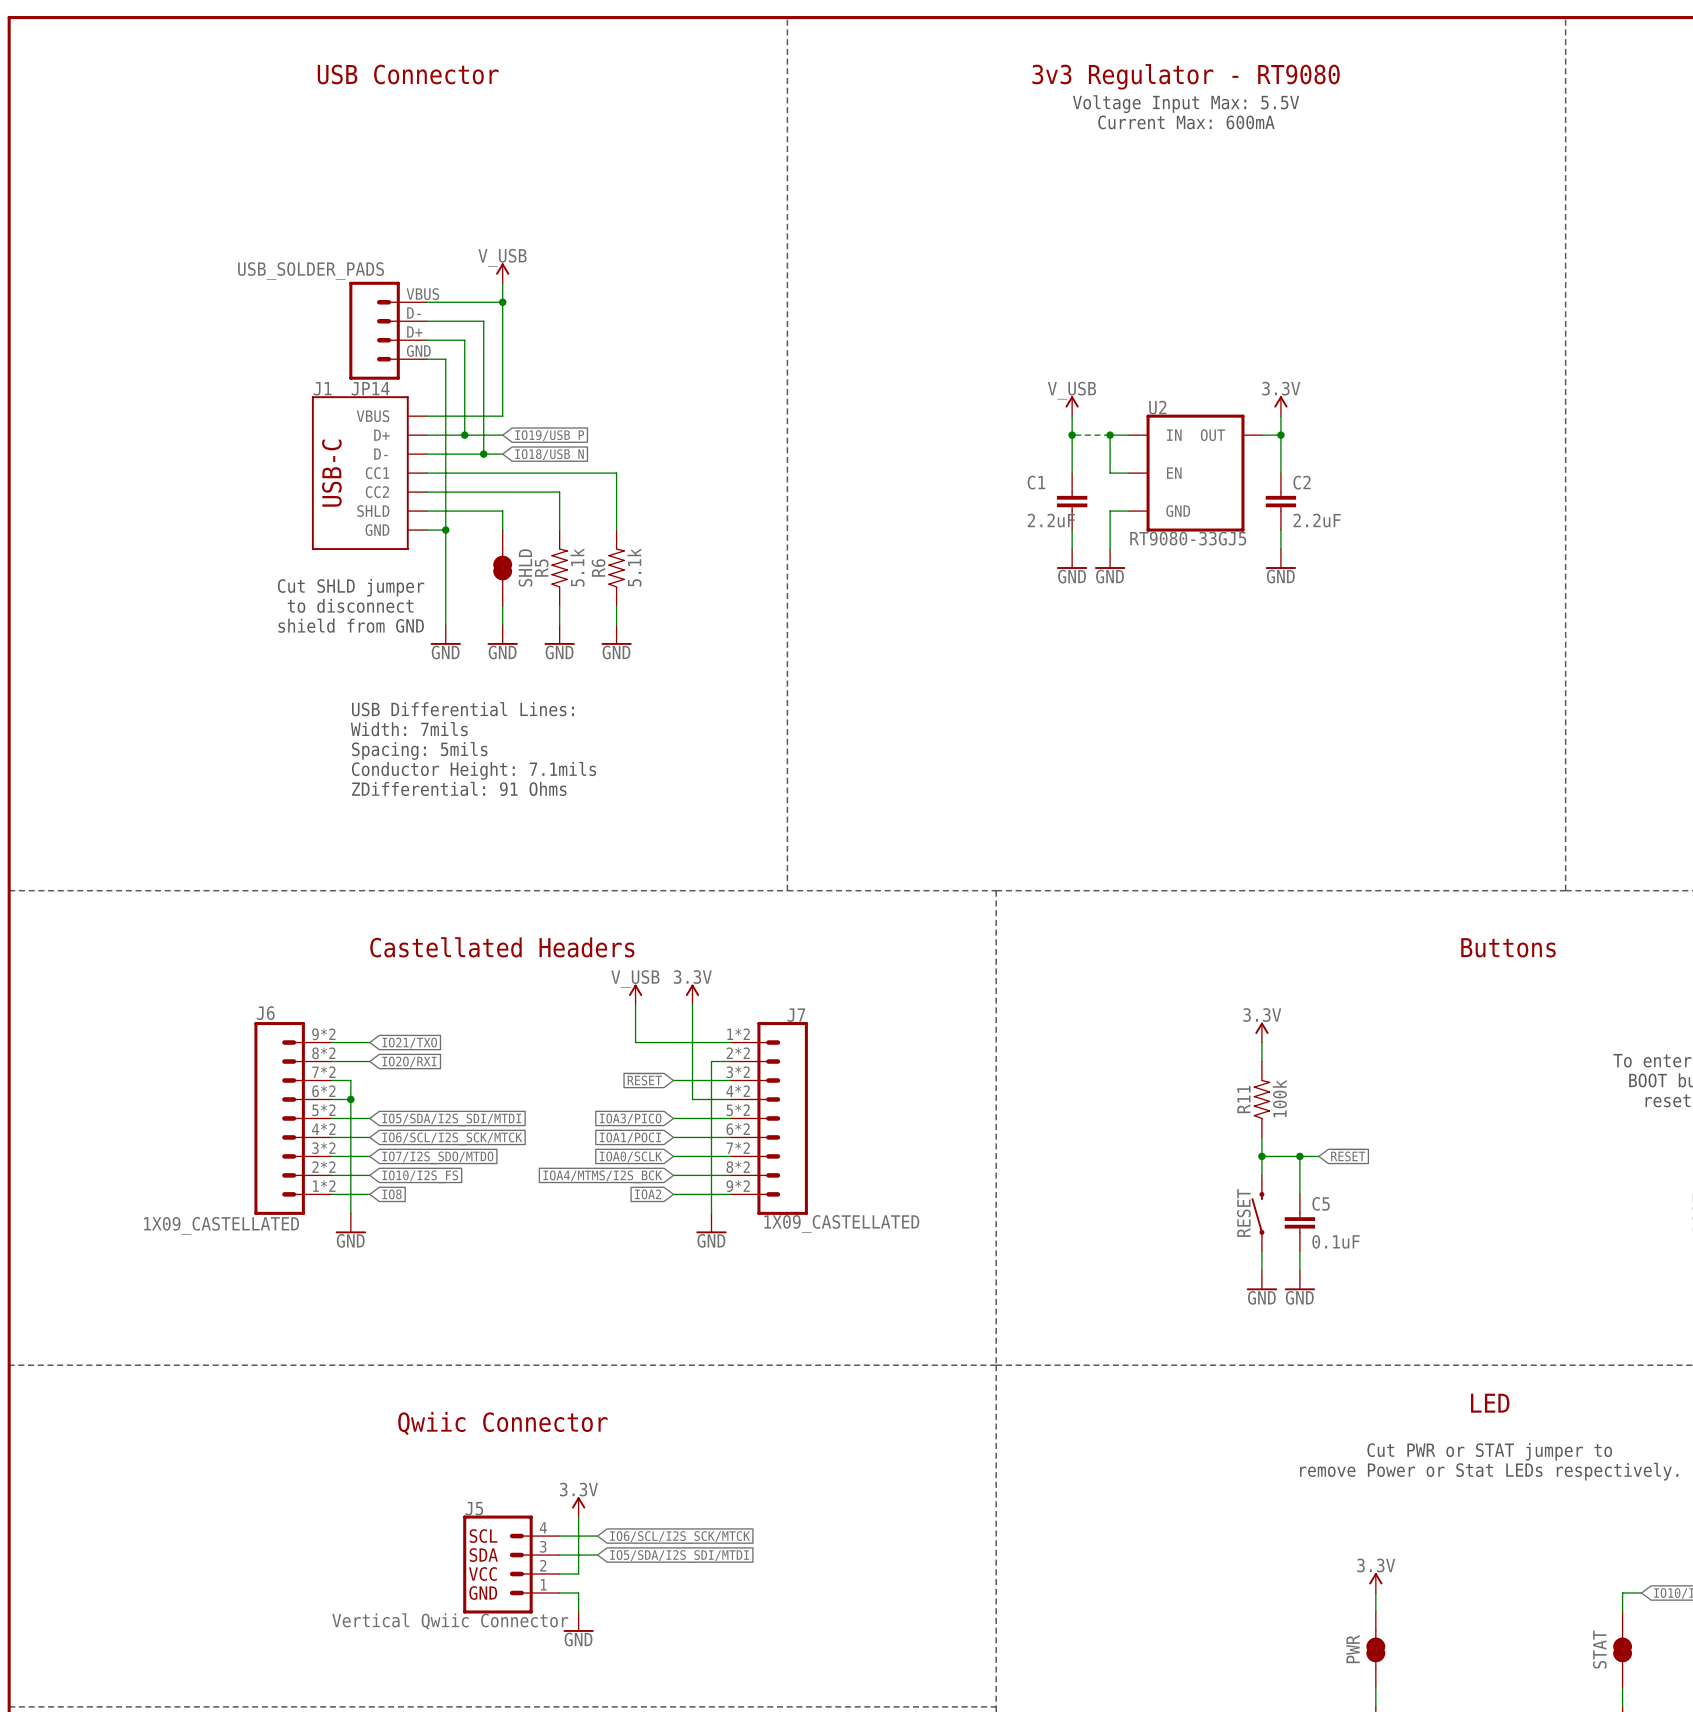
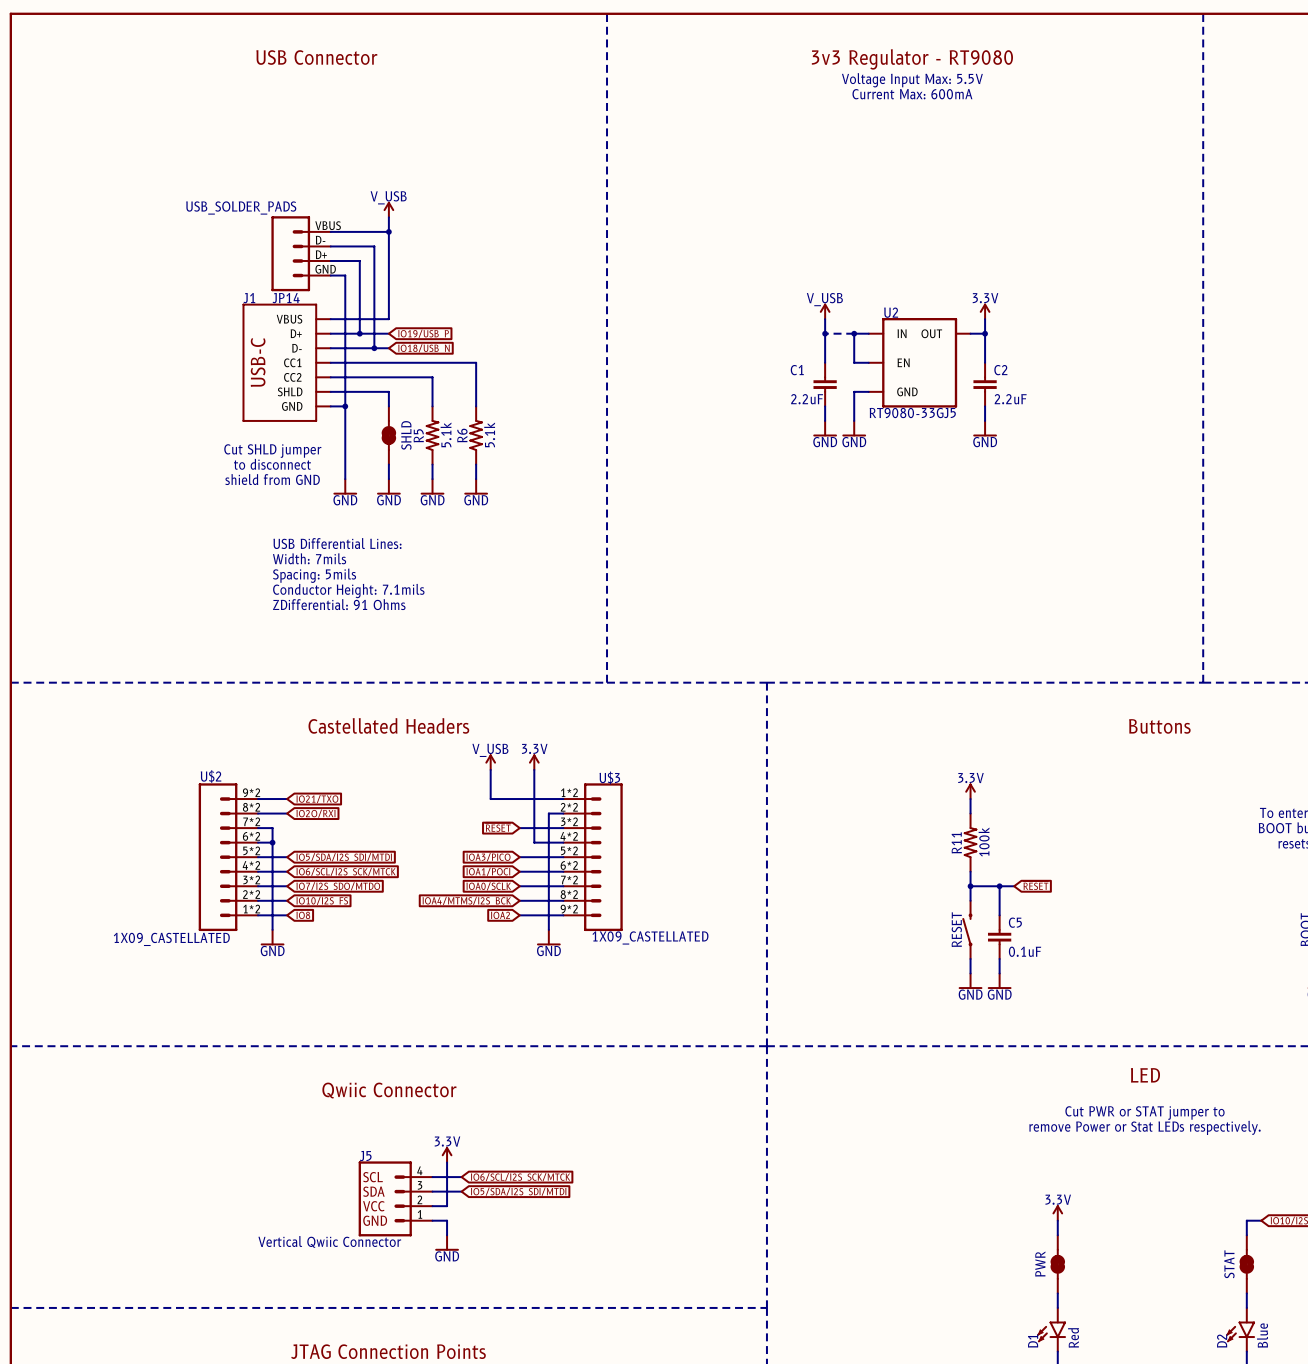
J6 name: J6 (265, 1013) -> U$2 (211, 776)
J7 name: J7 (796, 1015) -> U$3 (609, 777)

